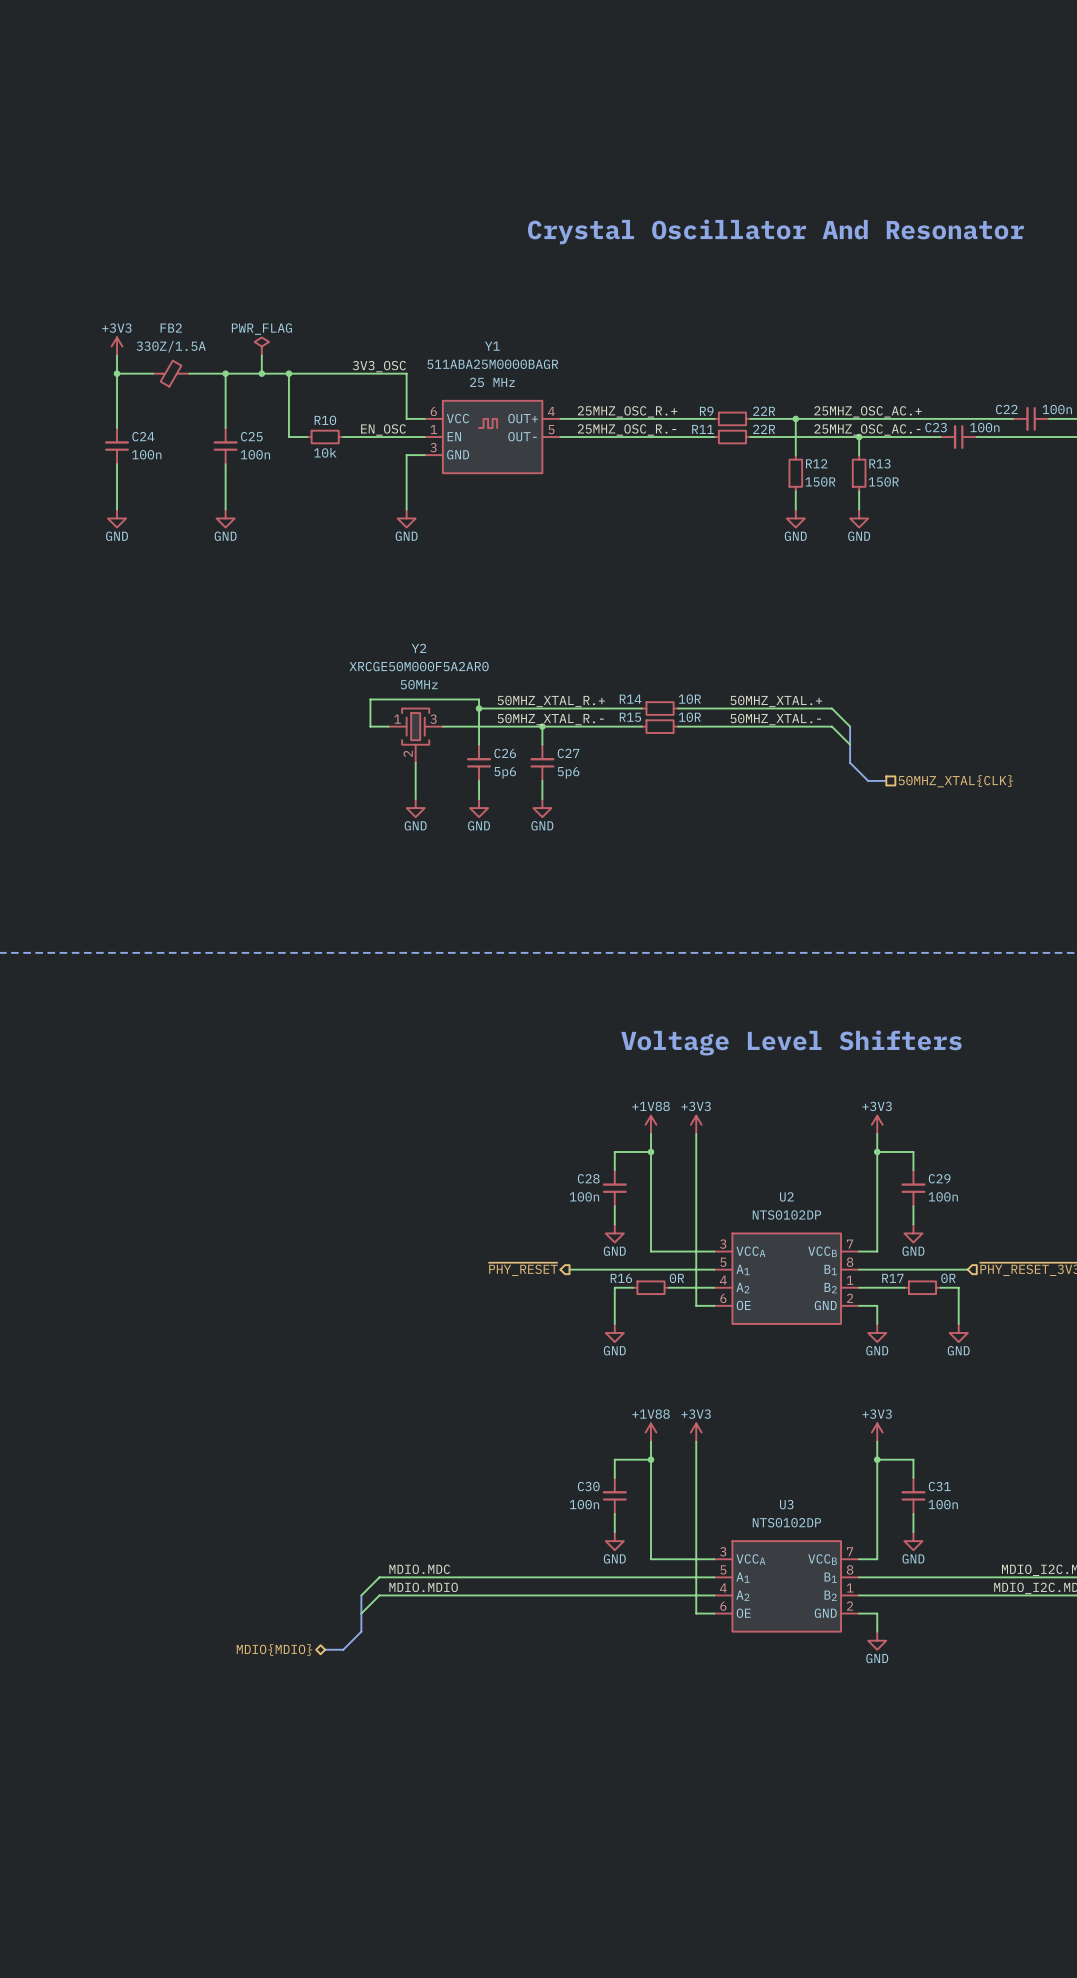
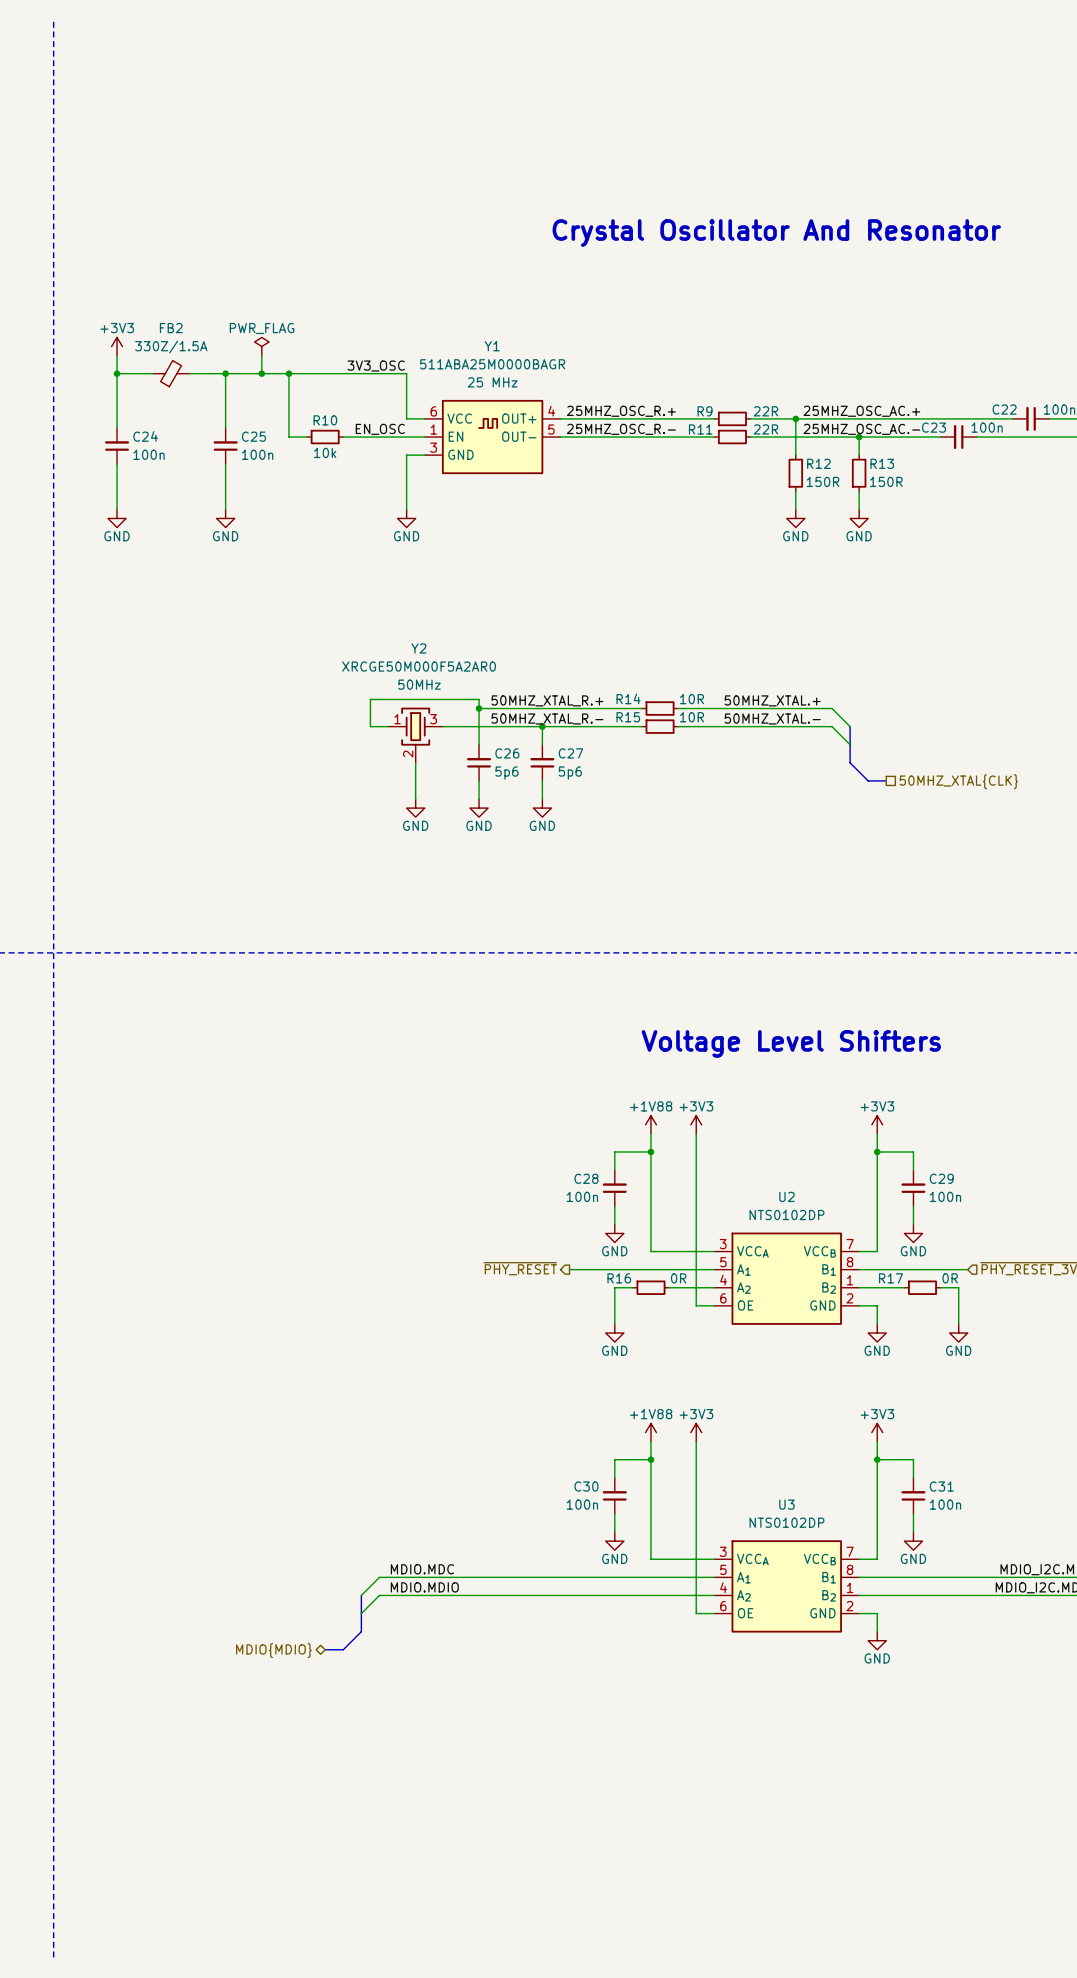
line: none -> (53, 20) (53, 1957)

